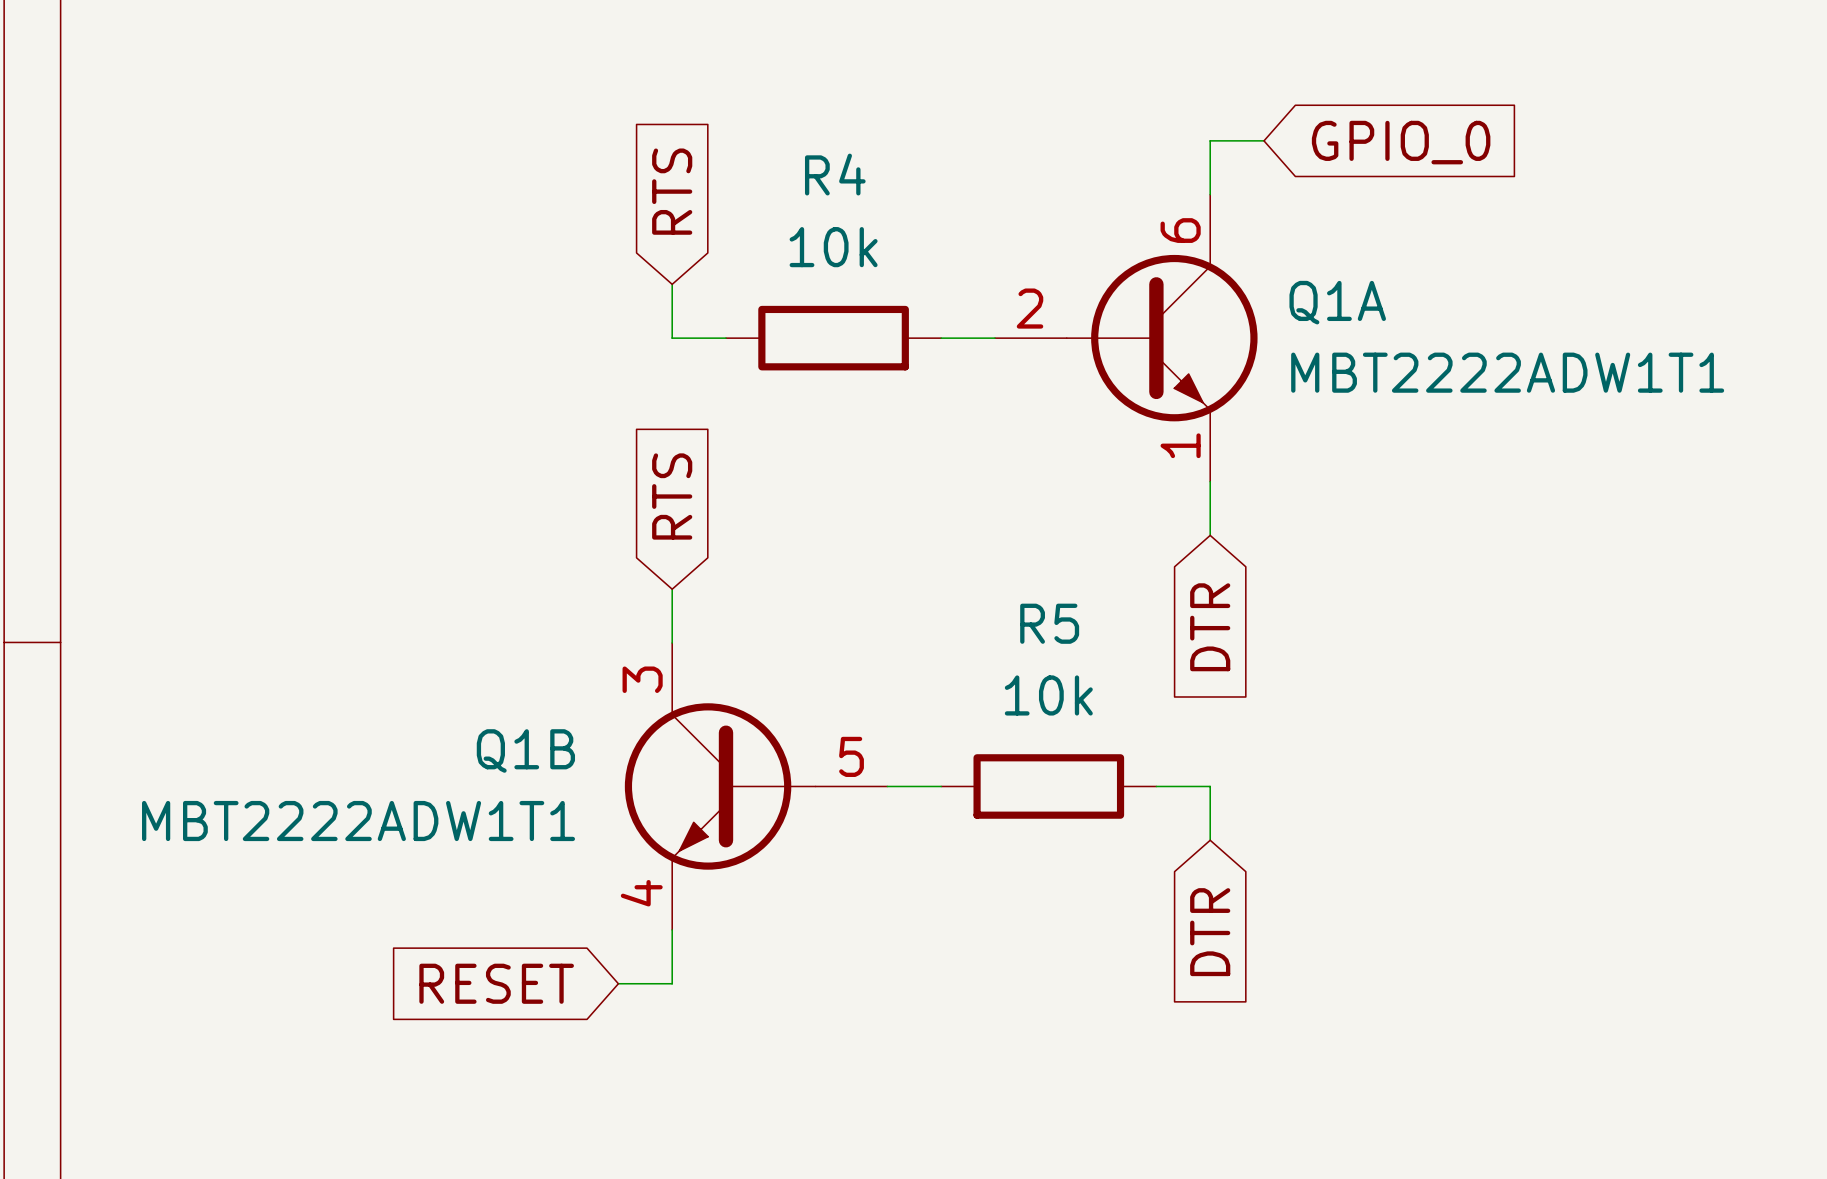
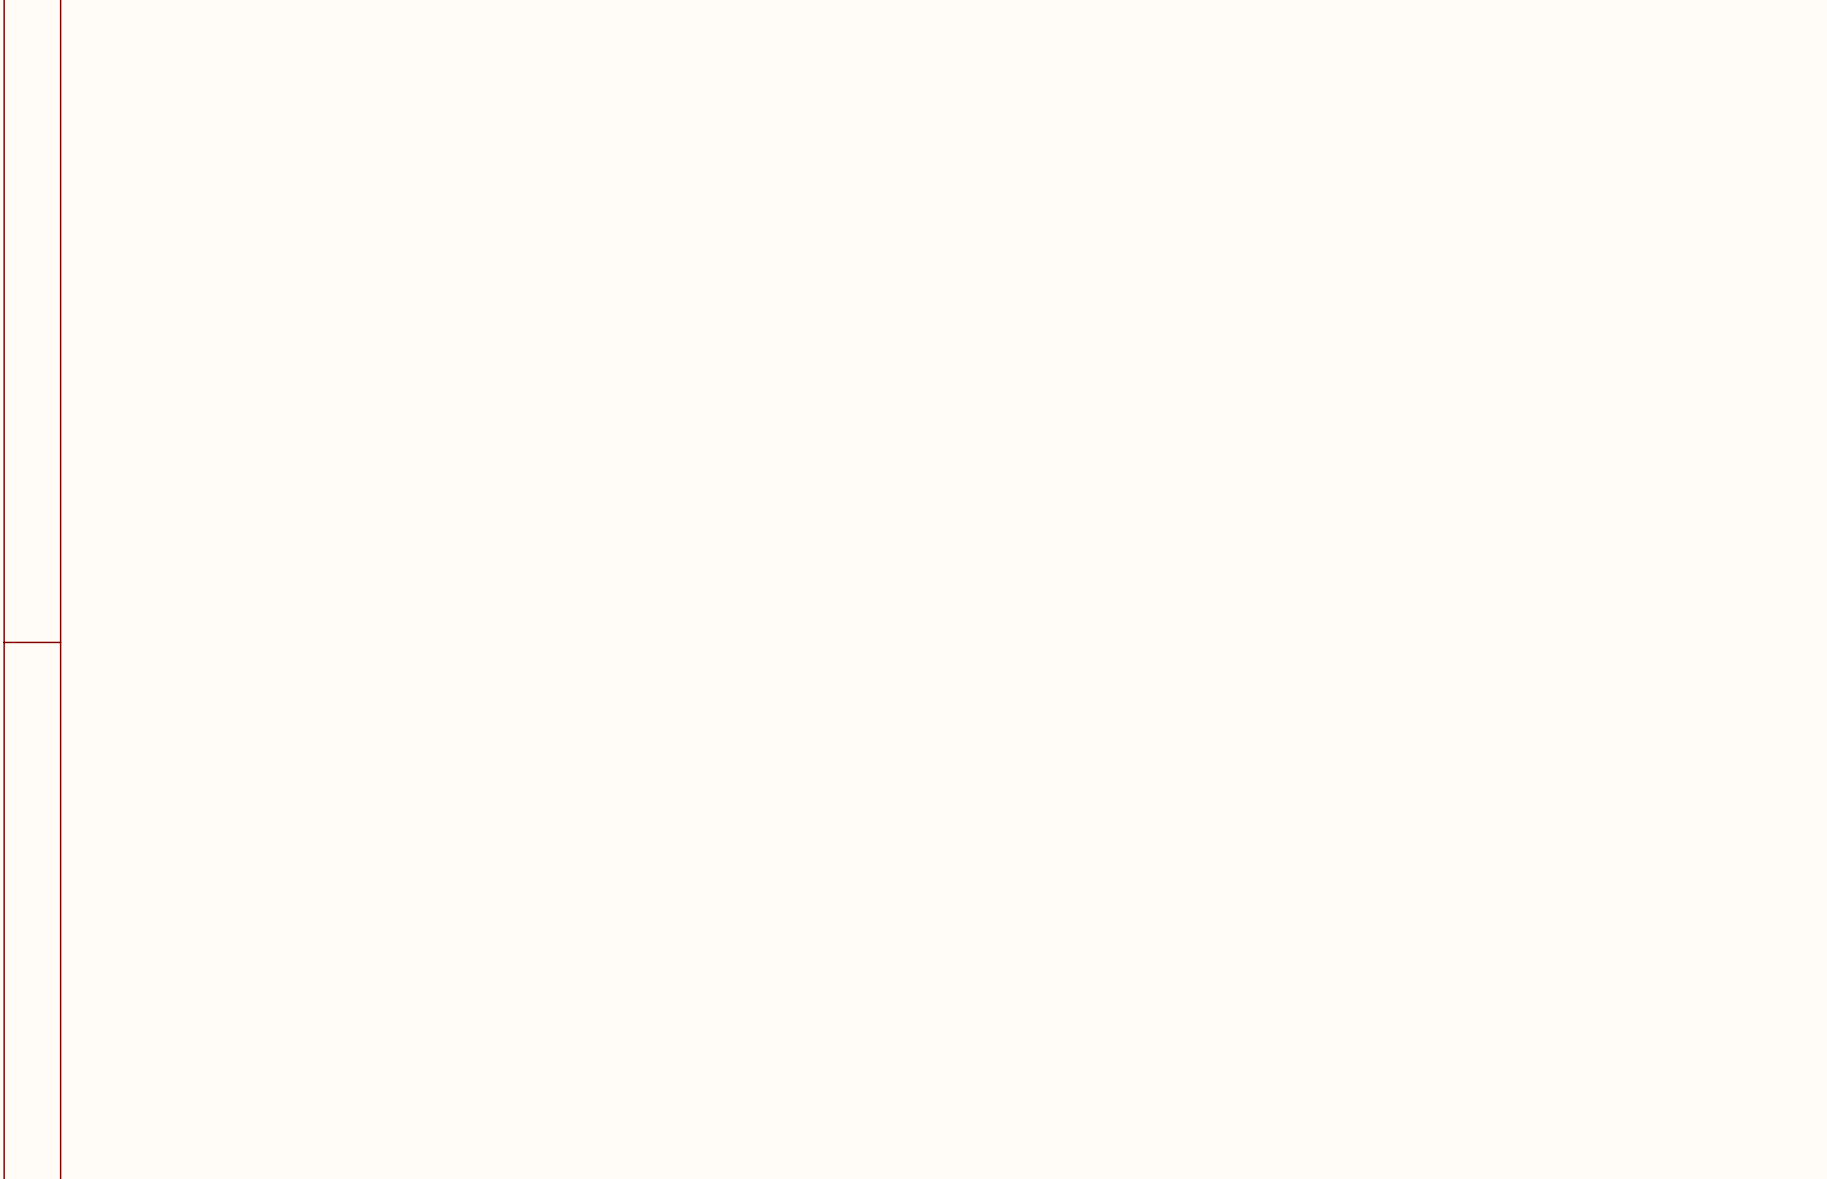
wire: (1264, 140) (1210, 140) (1210, 194) -> none
global label: GPIO_0 (1401, 142) -> none
global label: RTS (672, 191) -> none
wire: (672, 284) (672, 338) (725, 338) -> none
R4: 10k (833, 338) -> none
wire: (941, 338) (995, 338) -> none
Q1A: MBT2222ADW1T1 (1126, 338) -> none
wire: (1210, 481) (1210, 535) -> none
global label: RTS (672, 496) -> none
wire: (672, 589) (672, 643) -> none
global label: DTR (1210, 627) -> none
Q1B: MBT2222ADW1T1 (756, 786) -> none
wire: (887, 786) (941, 786) -> none
R5: 10k (1048, 786) -> none
wire: (1156, 786) (1210, 786) (1210, 840) -> none
wire: (672, 929) (672, 983) (618, 983) -> none
global label: DTR (1210, 932) -> none
global label: RESET (496, 983) -> none

